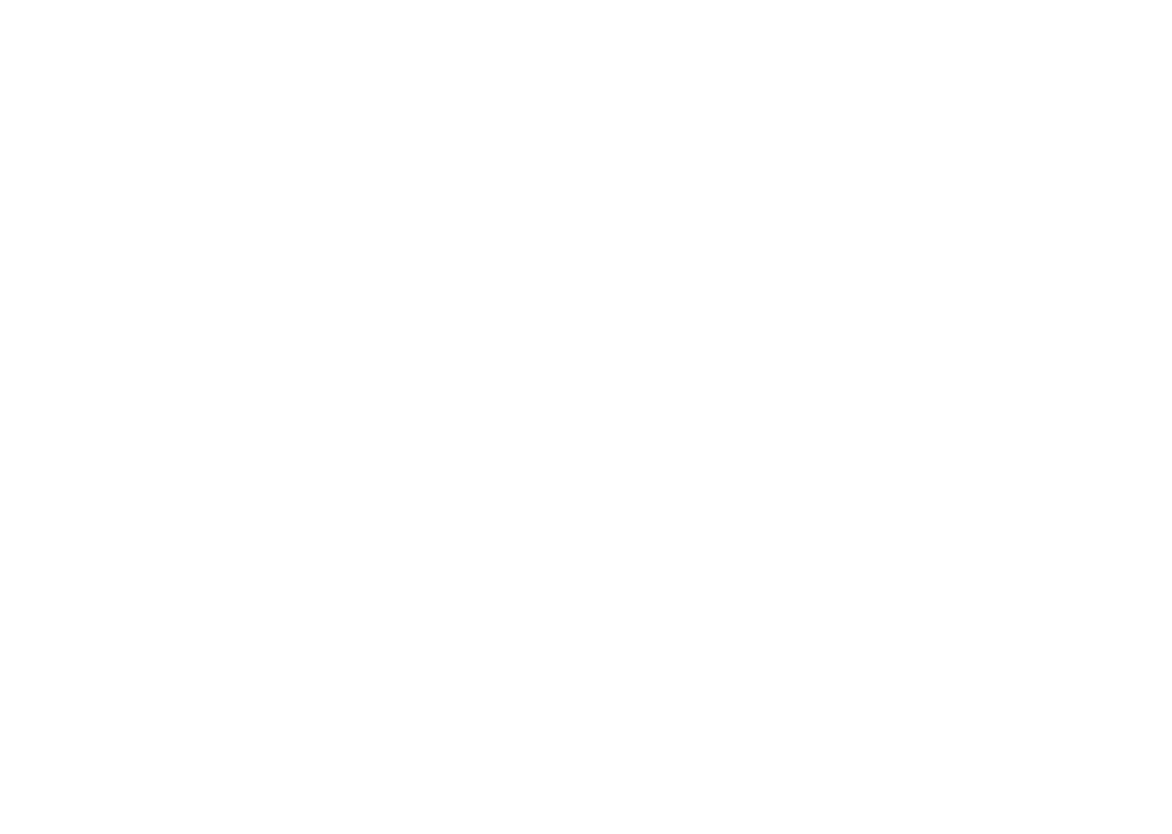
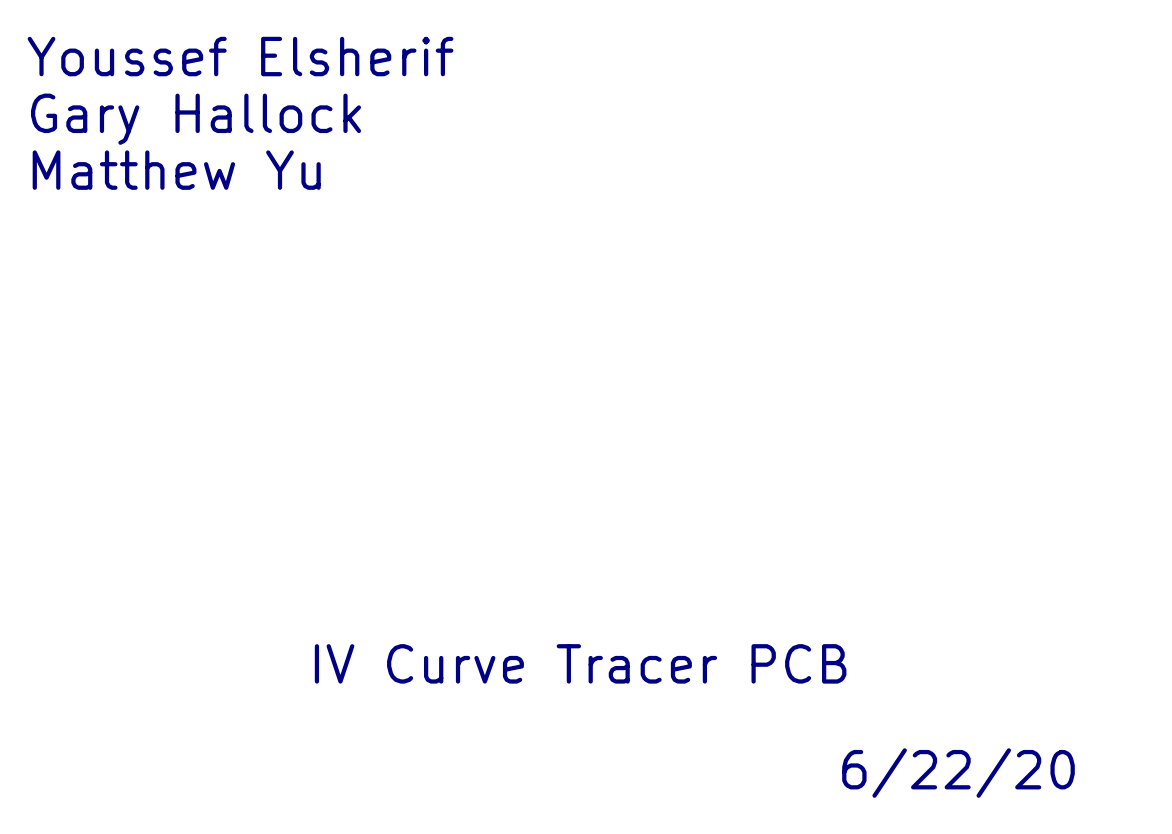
text: none -> Youssef Elsherif (240, 56)
text: none -> Gary Hallock (196, 119)
text: none -> Matthew Yu (176, 170)
text: none -> IV Curve Tracer PCB (580, 663)
text: none -> 6/22/20 (958, 773)

